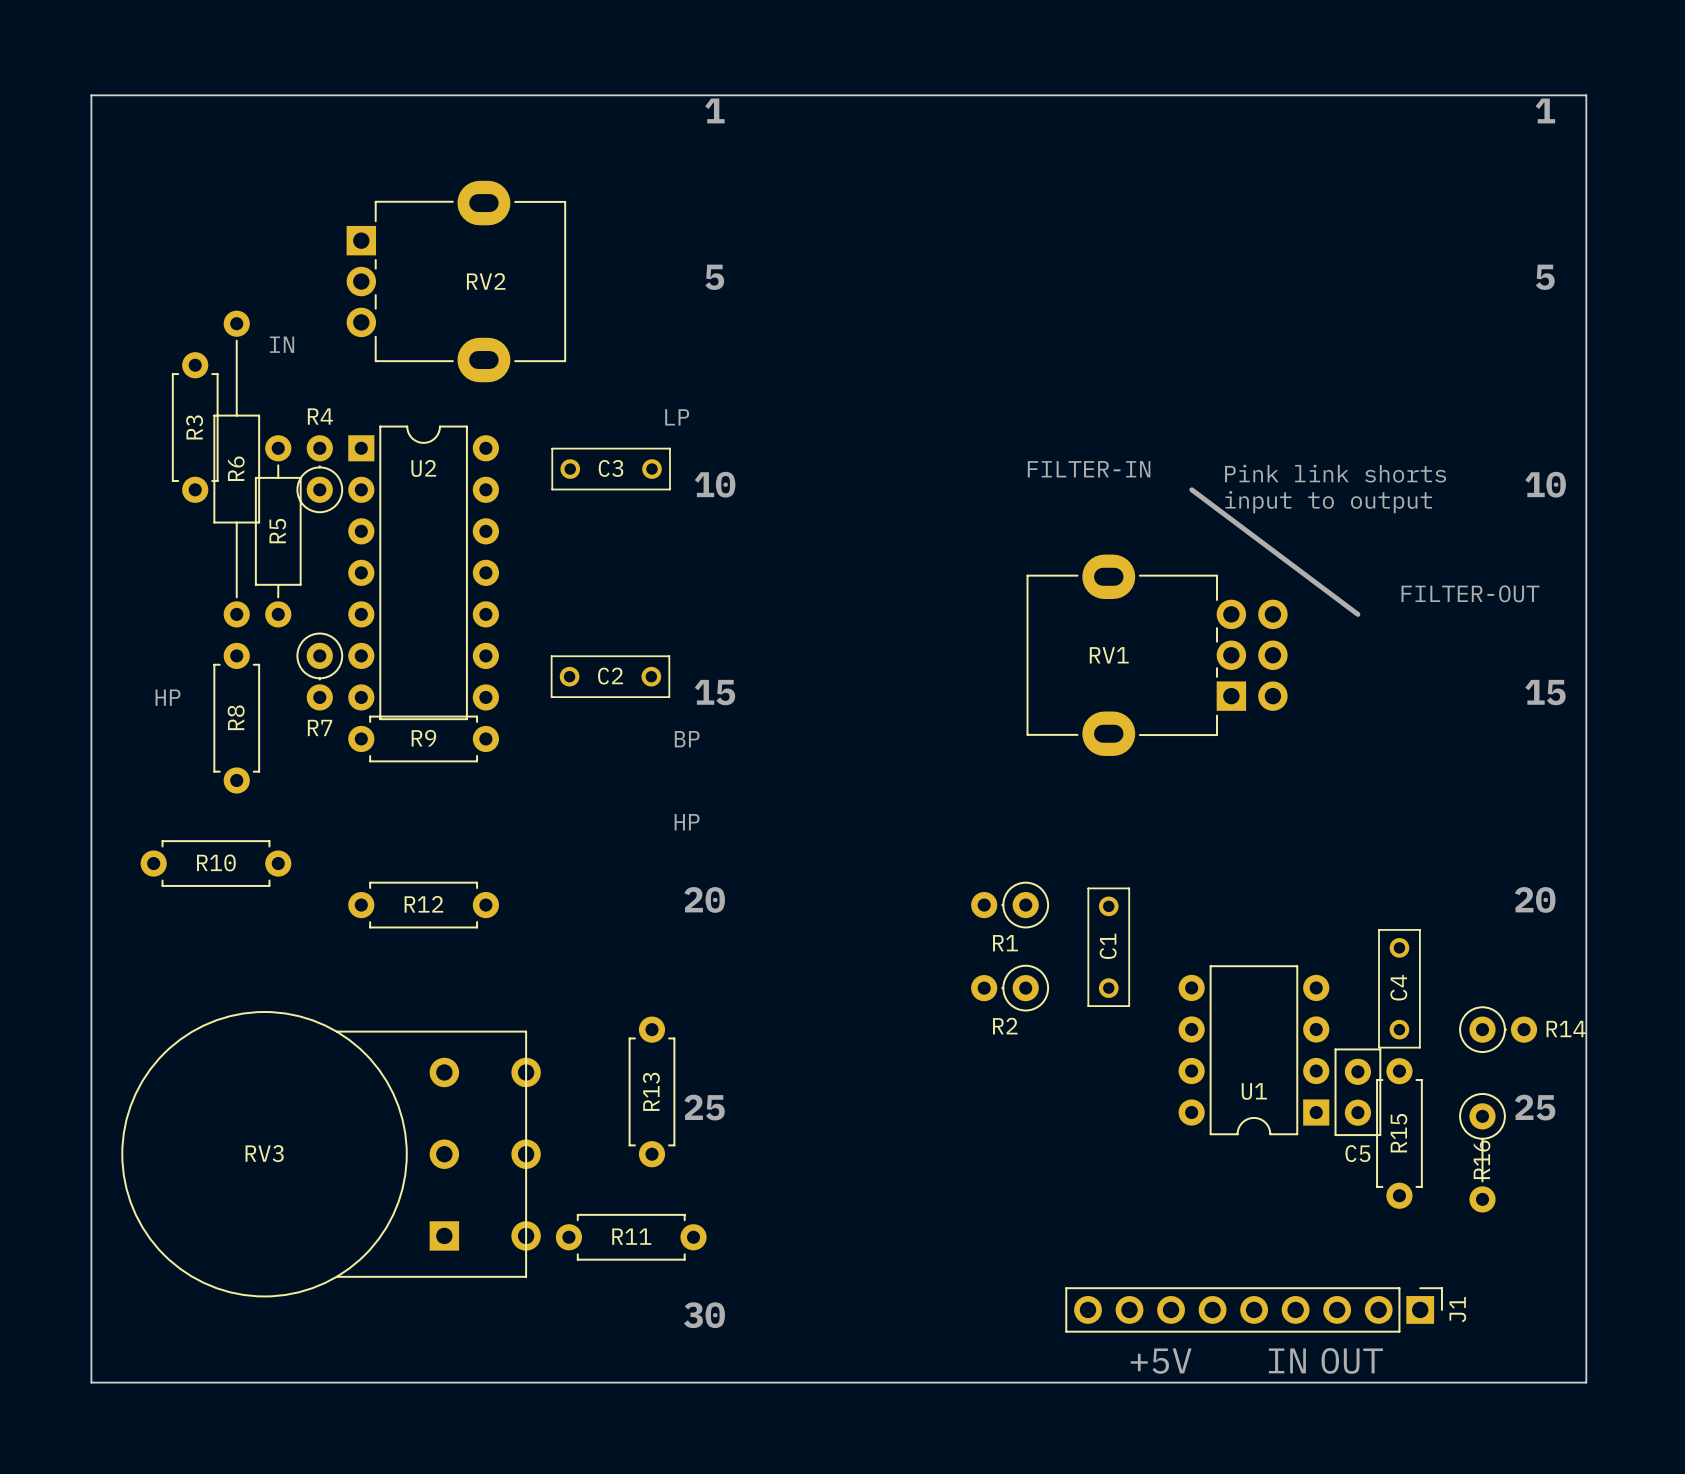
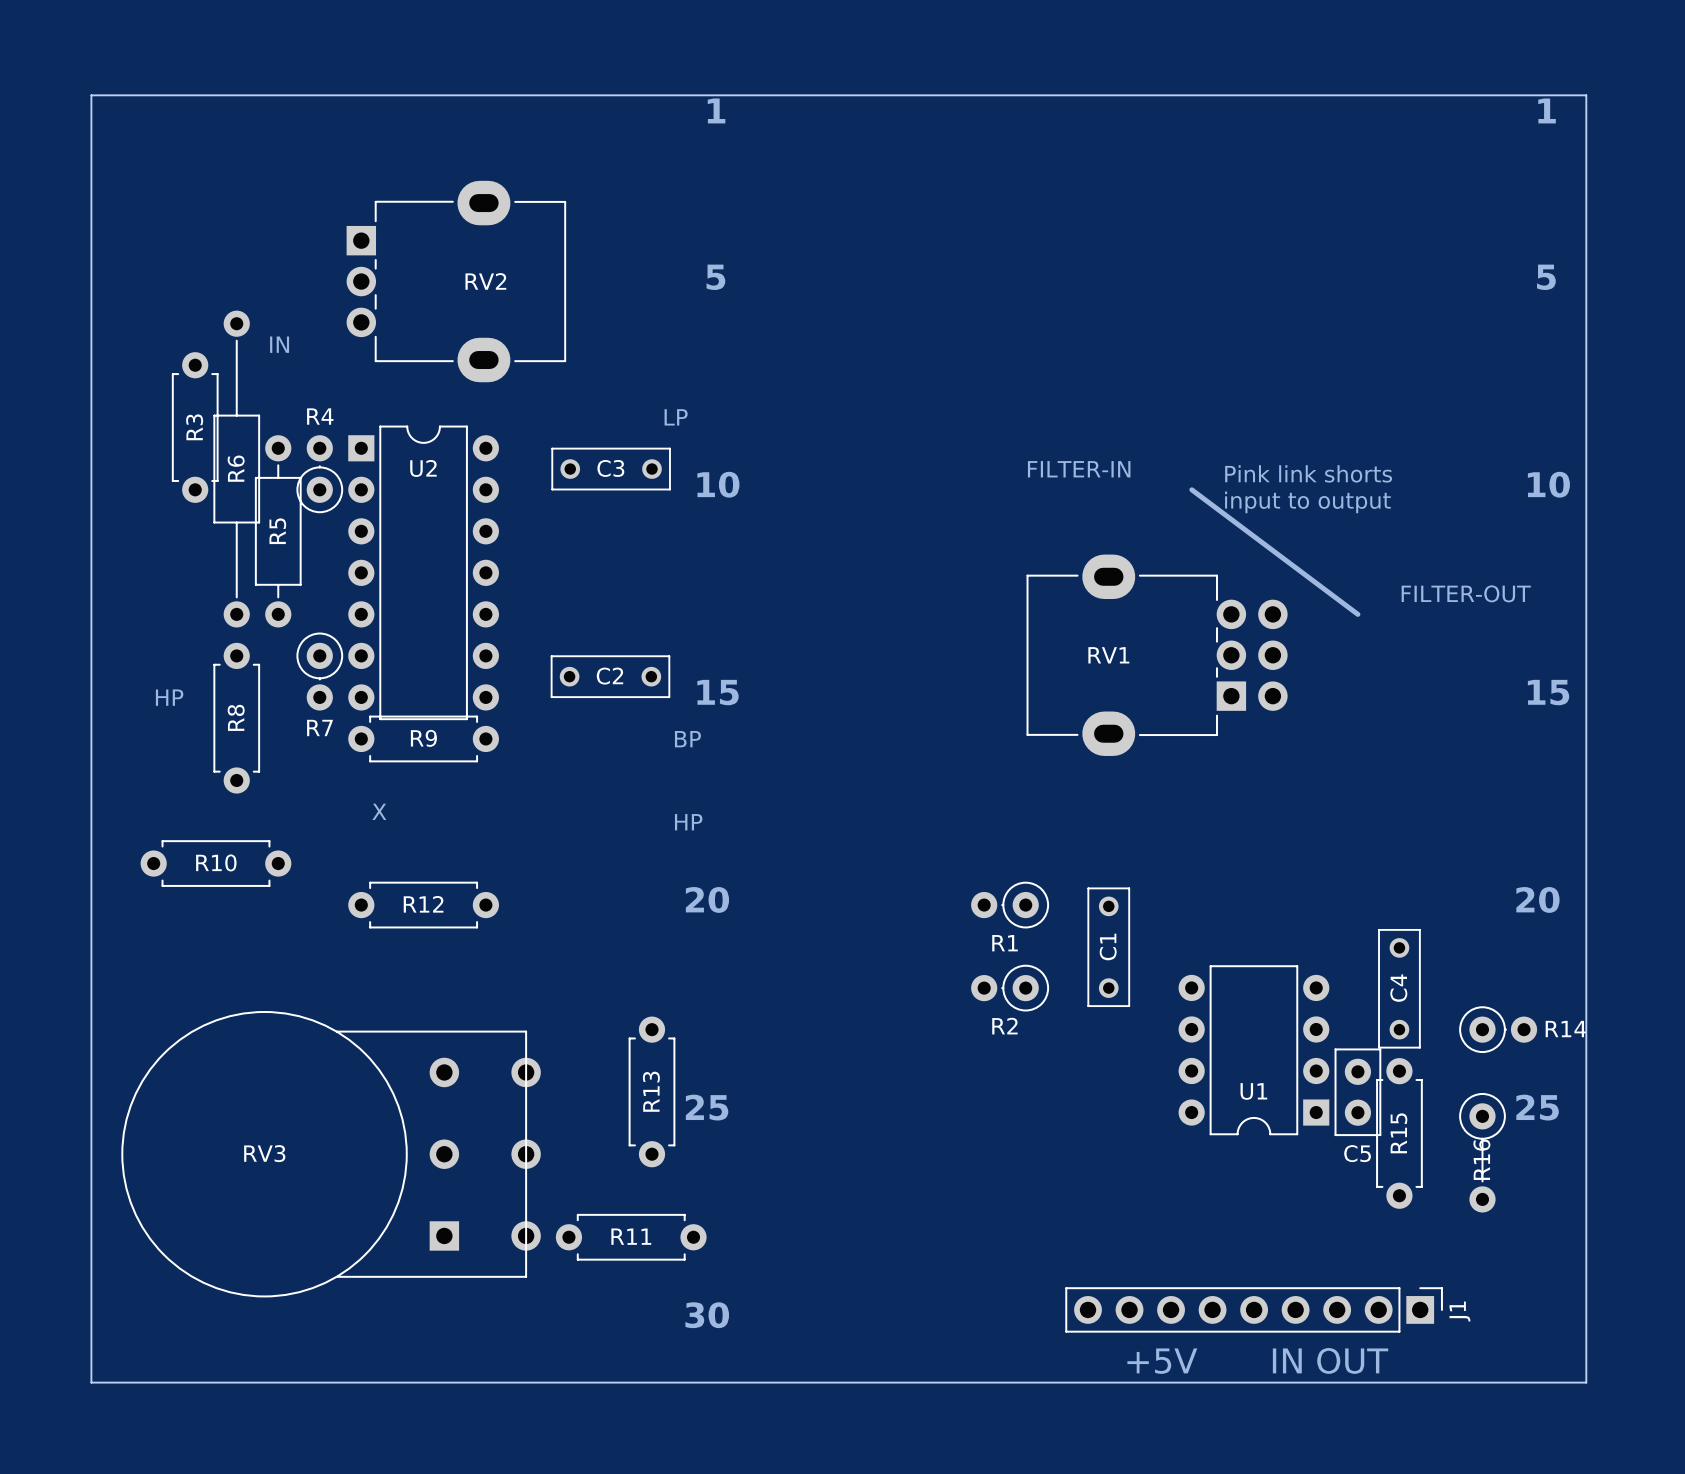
text: none -> X (379, 811)

